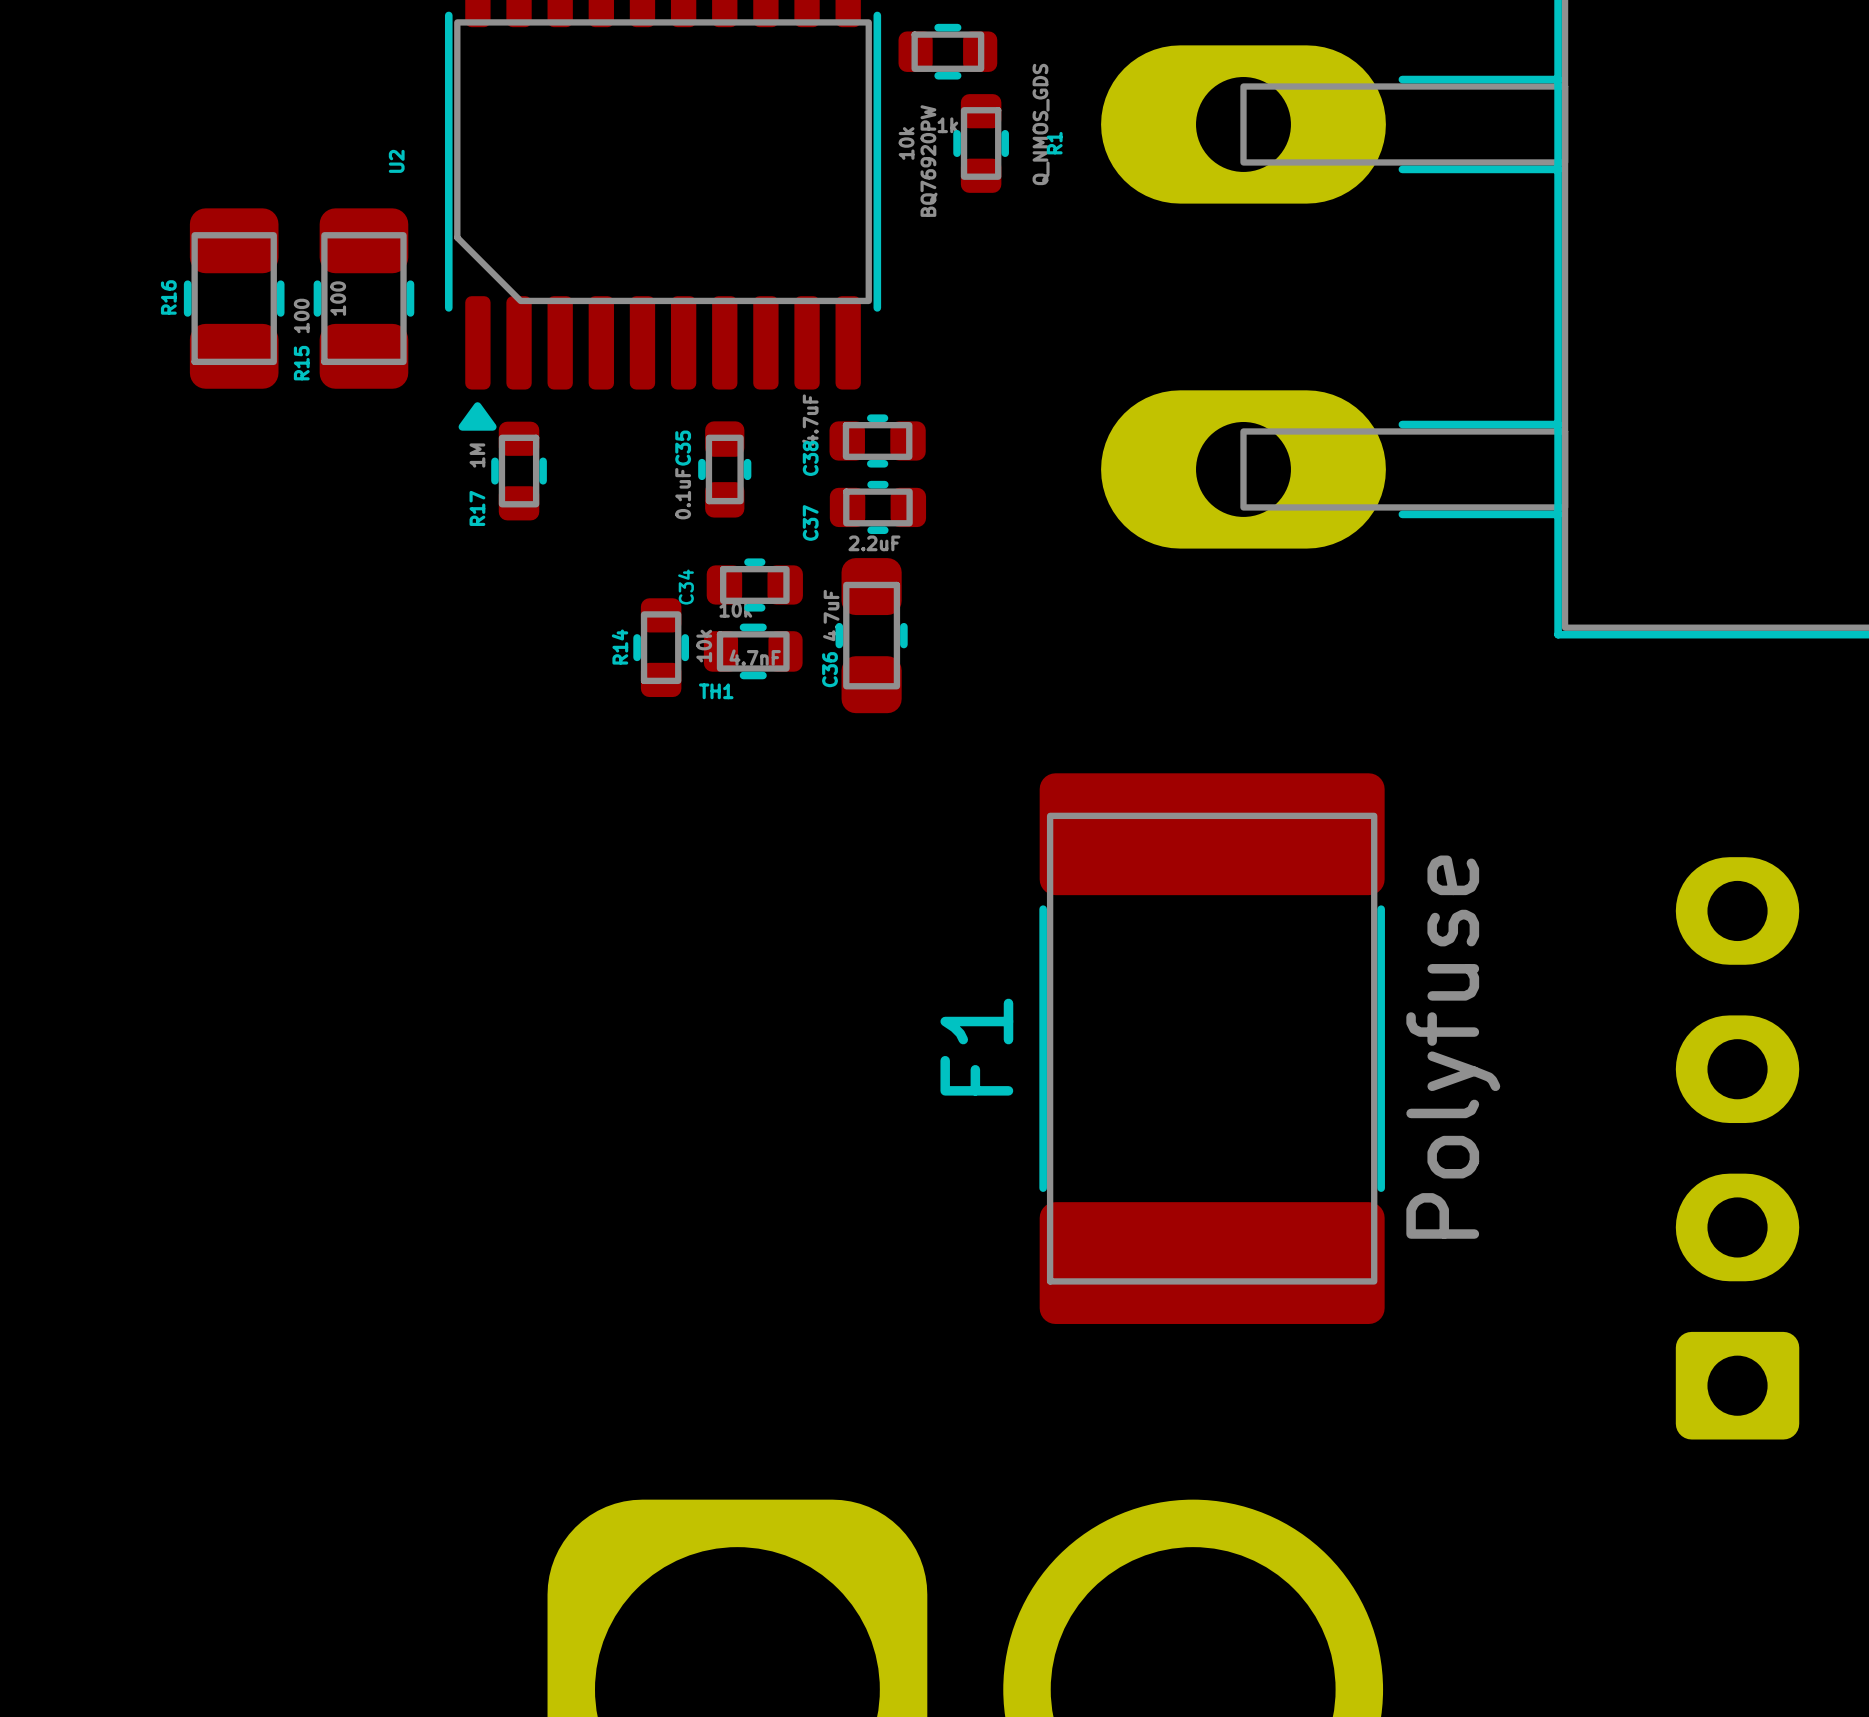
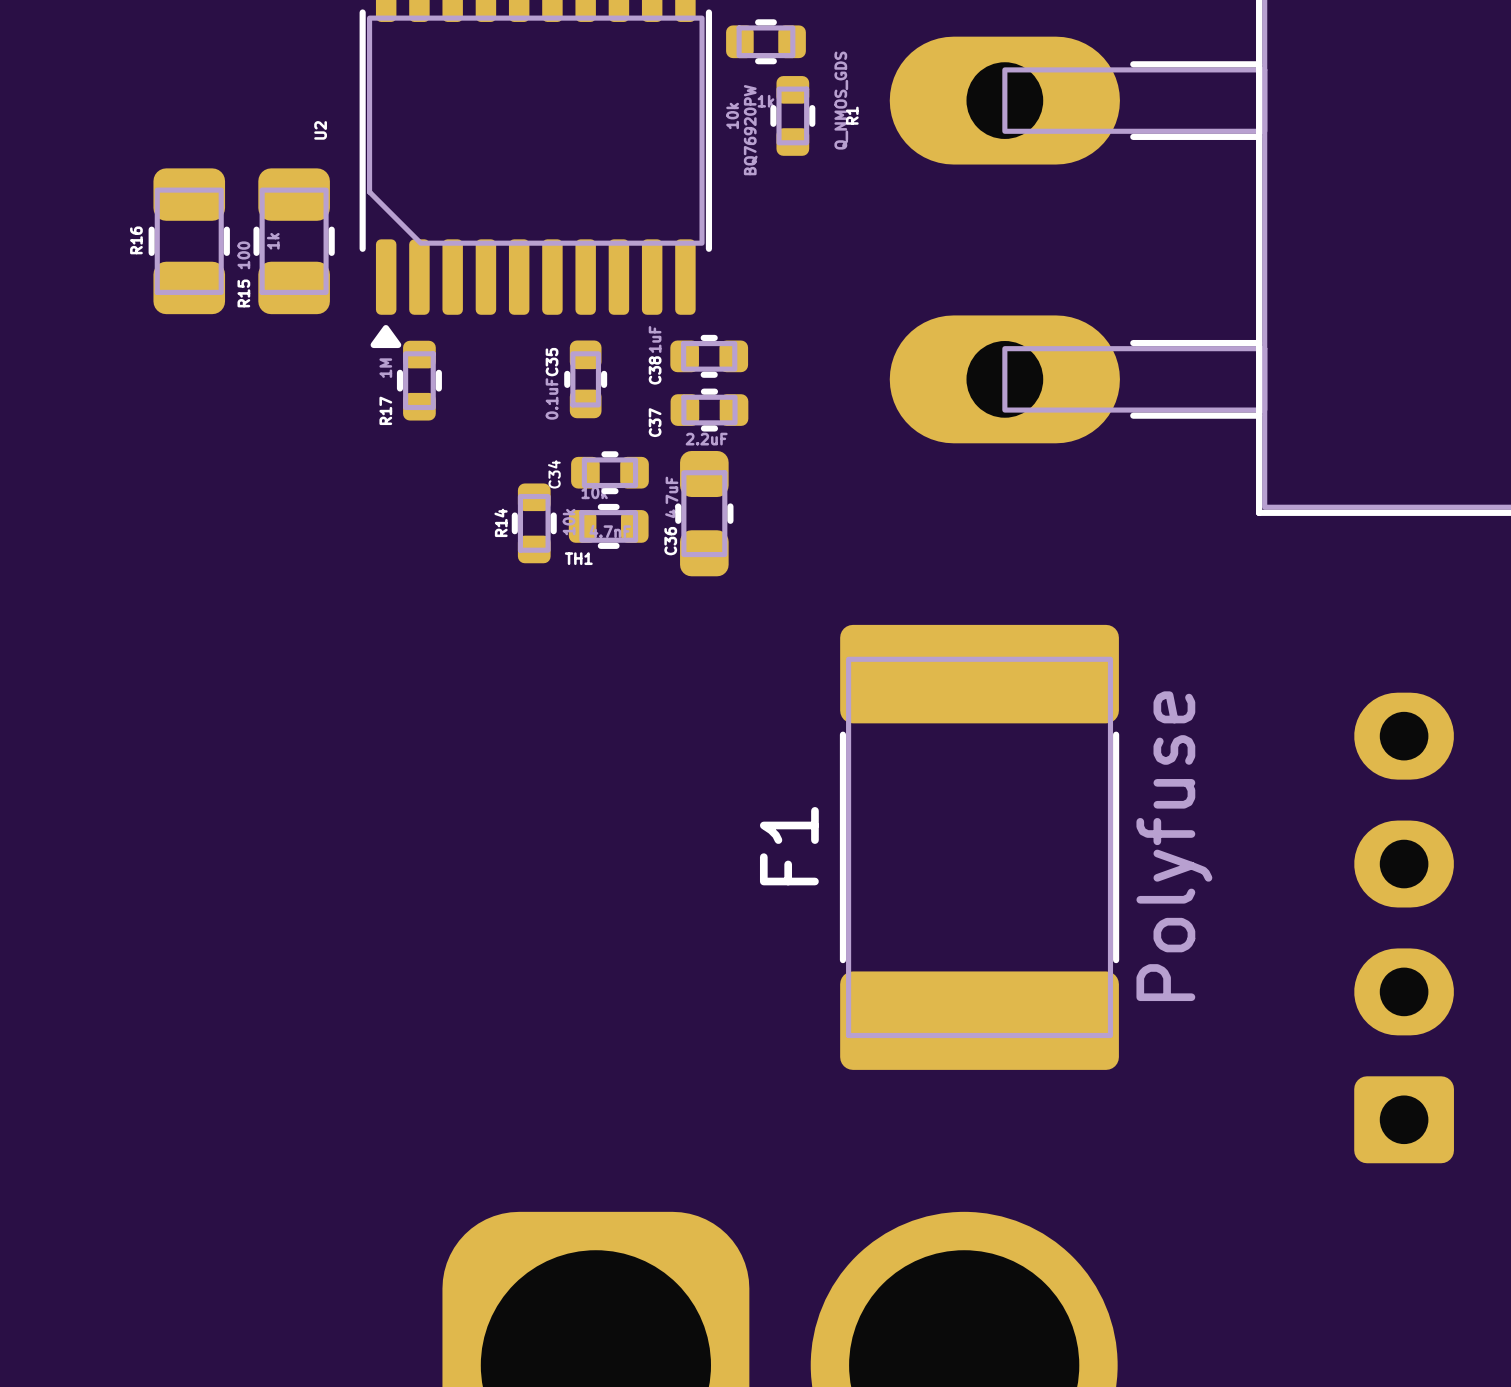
R16 value: 100 (338, 298) -> 1k (273, 241)
C38 value: 4.7uF (810, 420) -> 1uF (655, 339)

